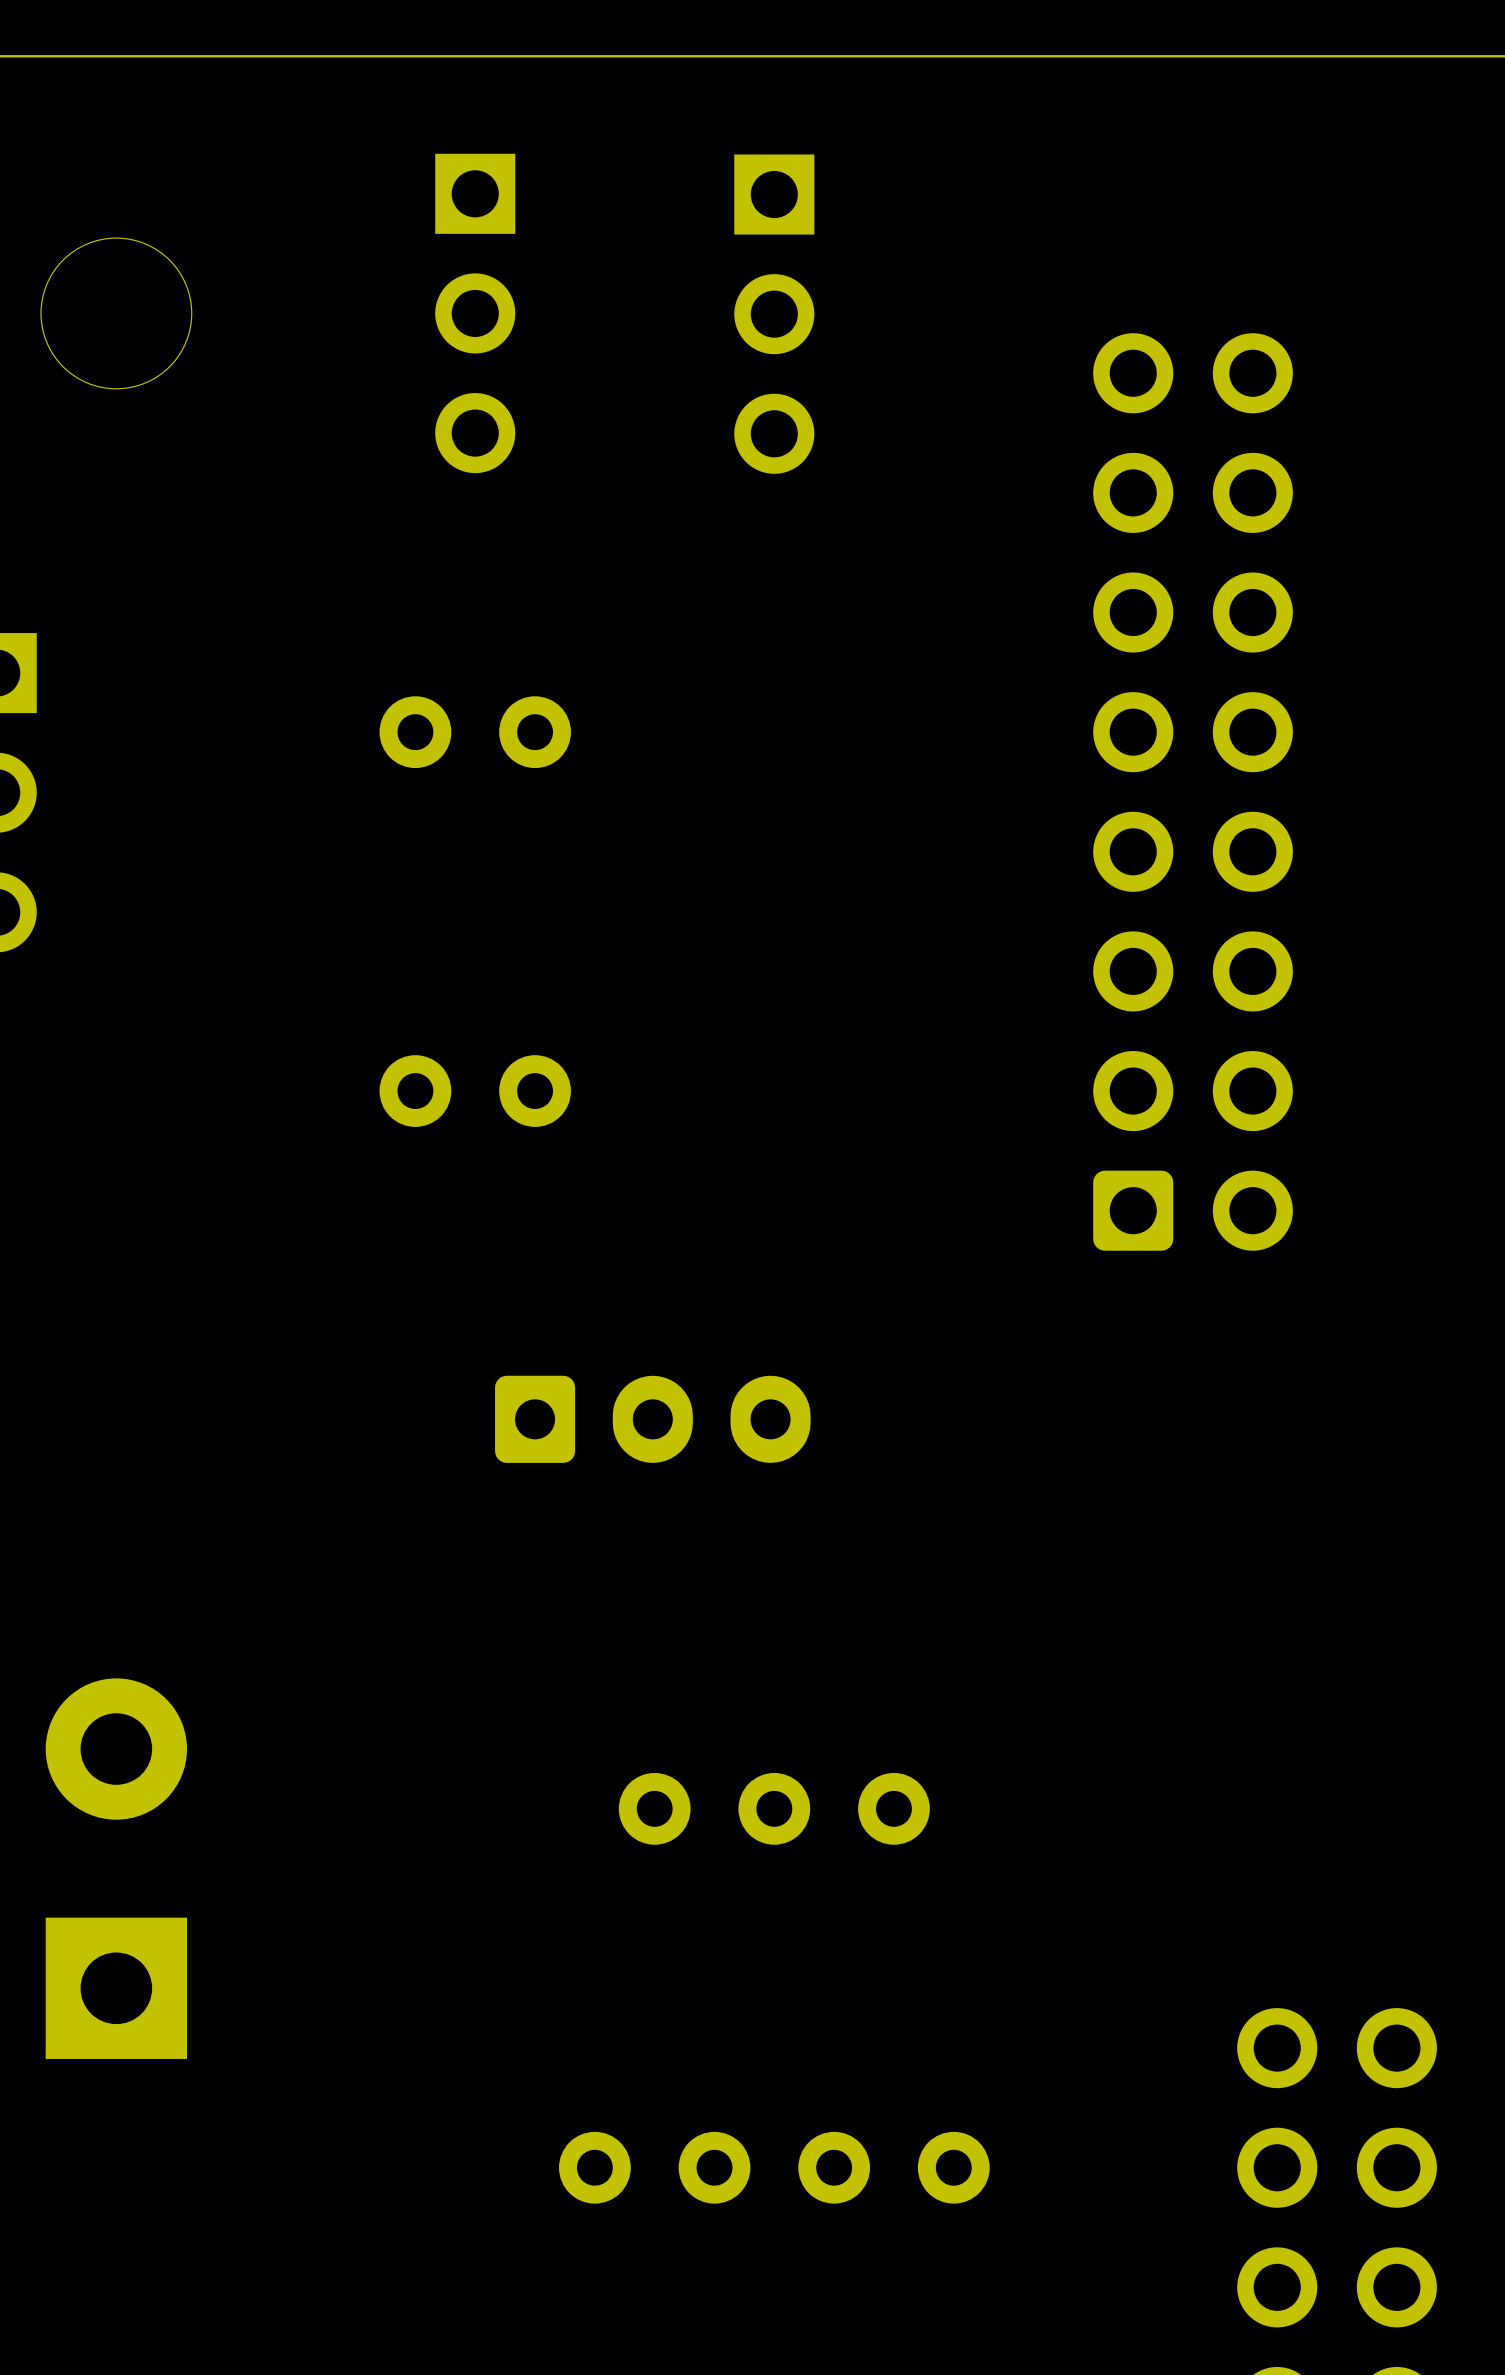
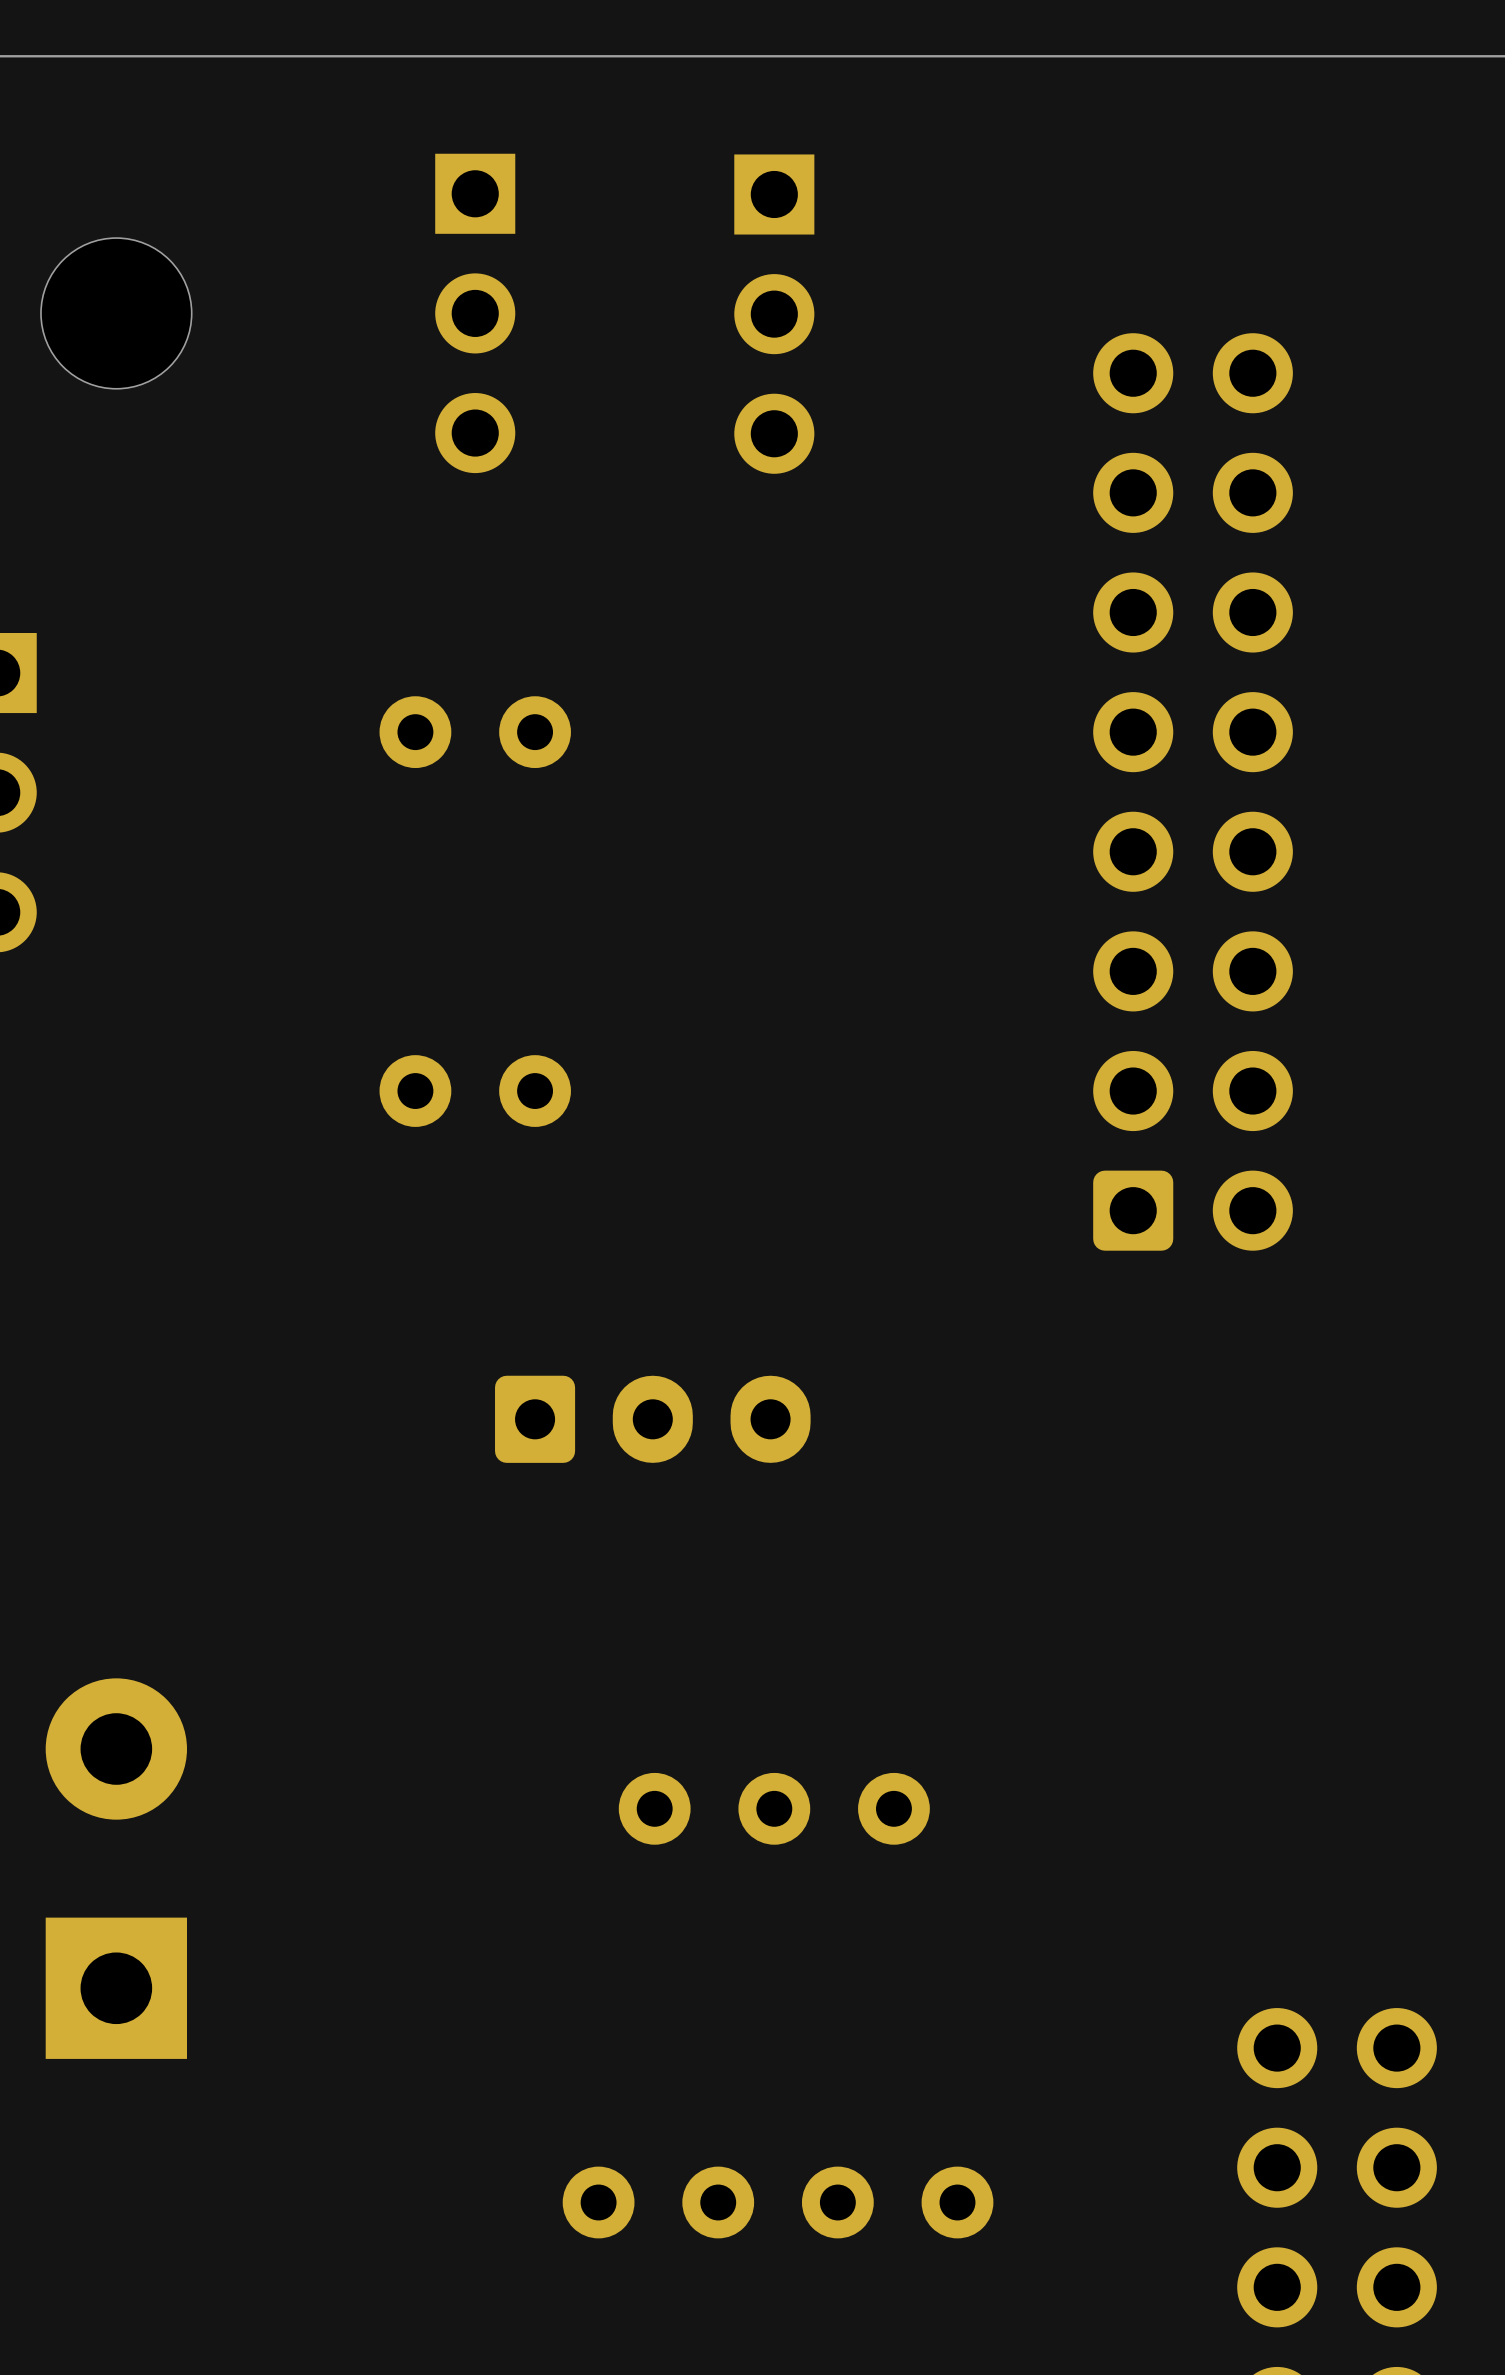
part position: (774, 2167) -> (778, 2202)

